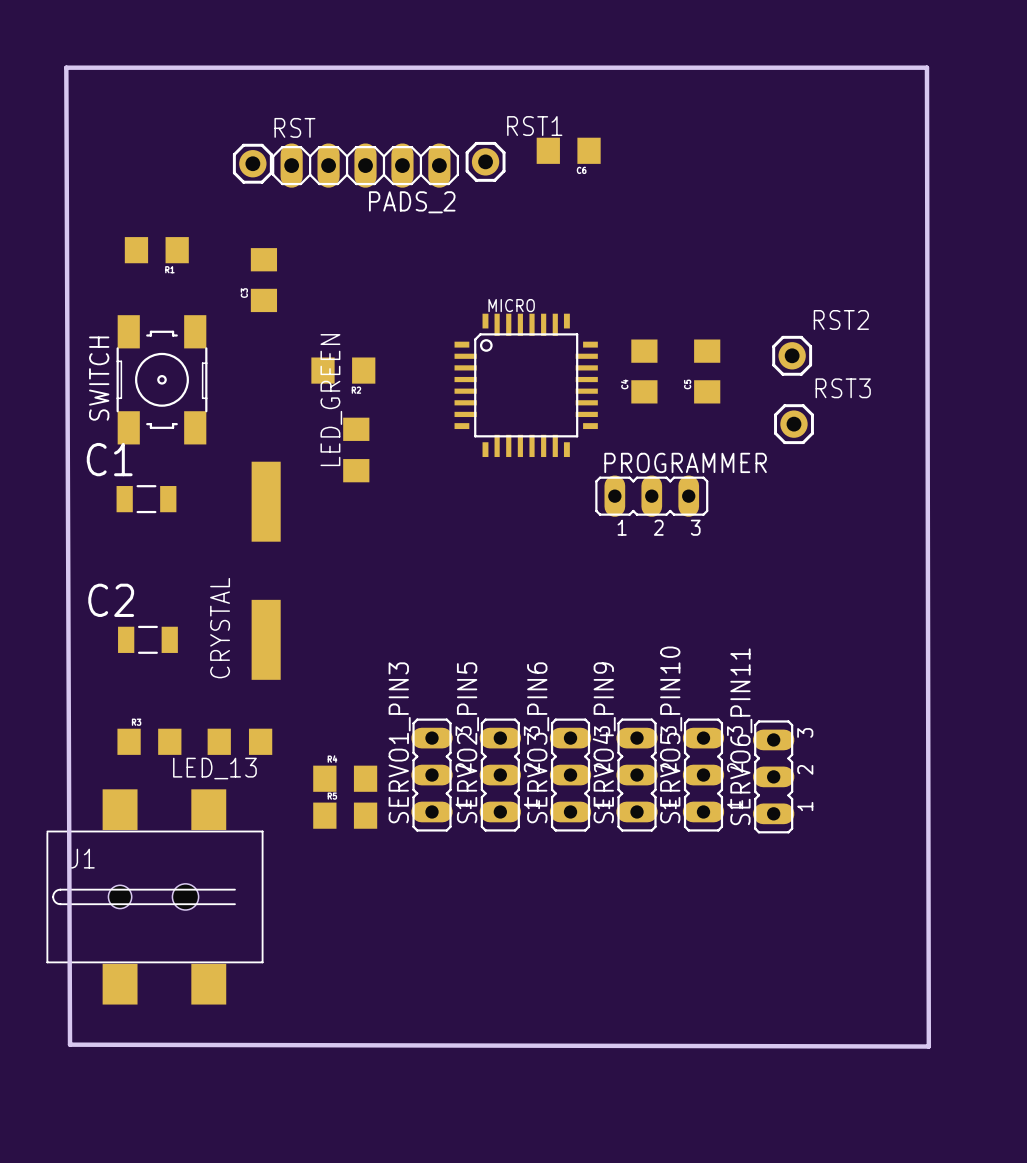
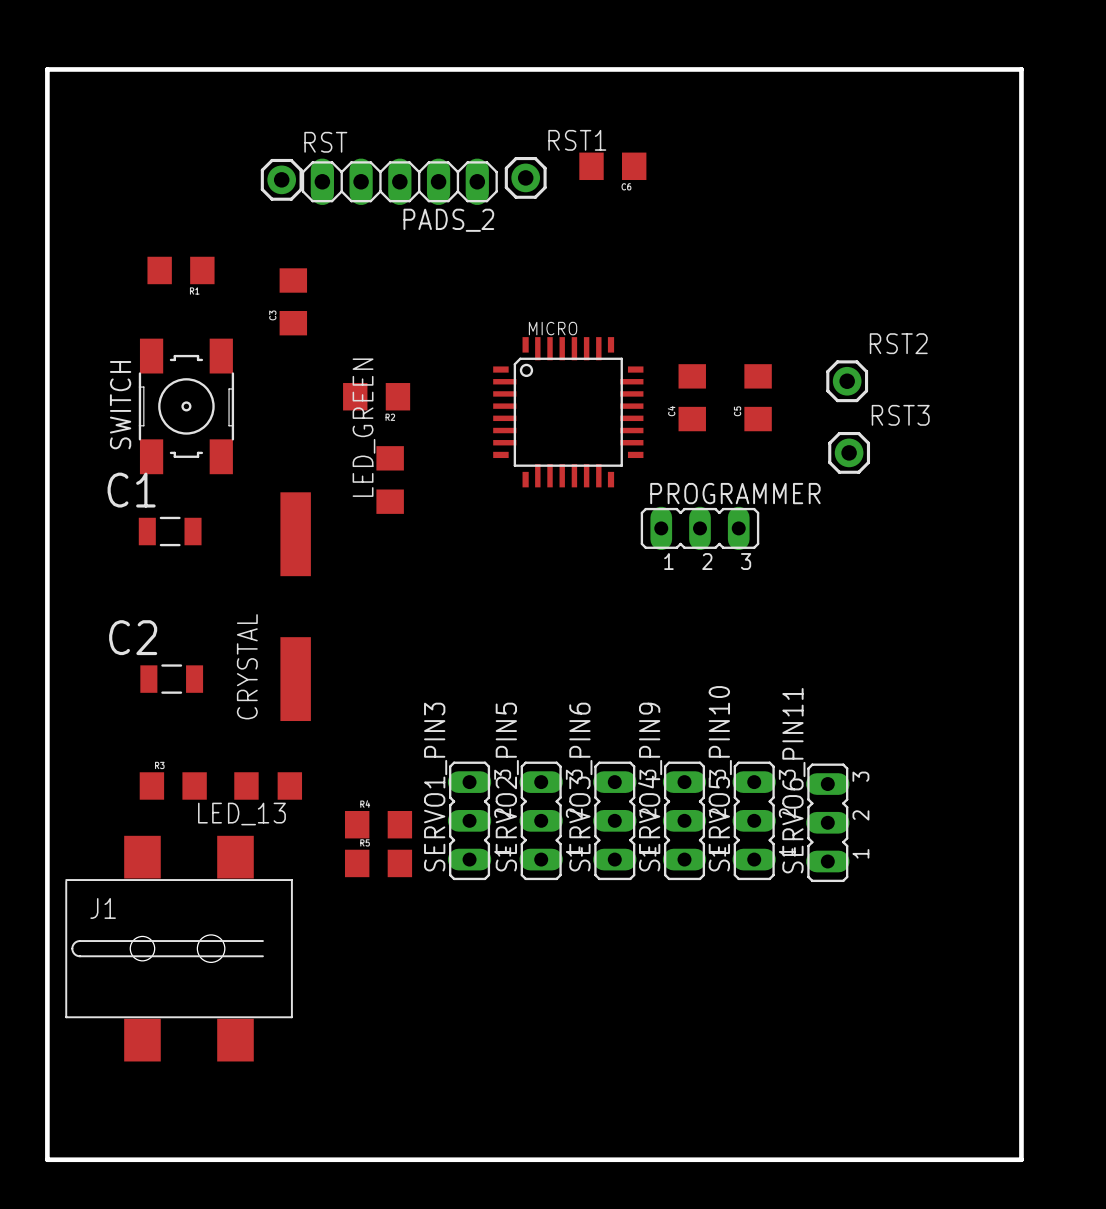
board edge: (66, 67) (926, 67) (928, 1046) (70, 1044) (66, 67) -> (47, 69) (47, 1159) (1021, 1159) (1021, 69) (47, 69)

